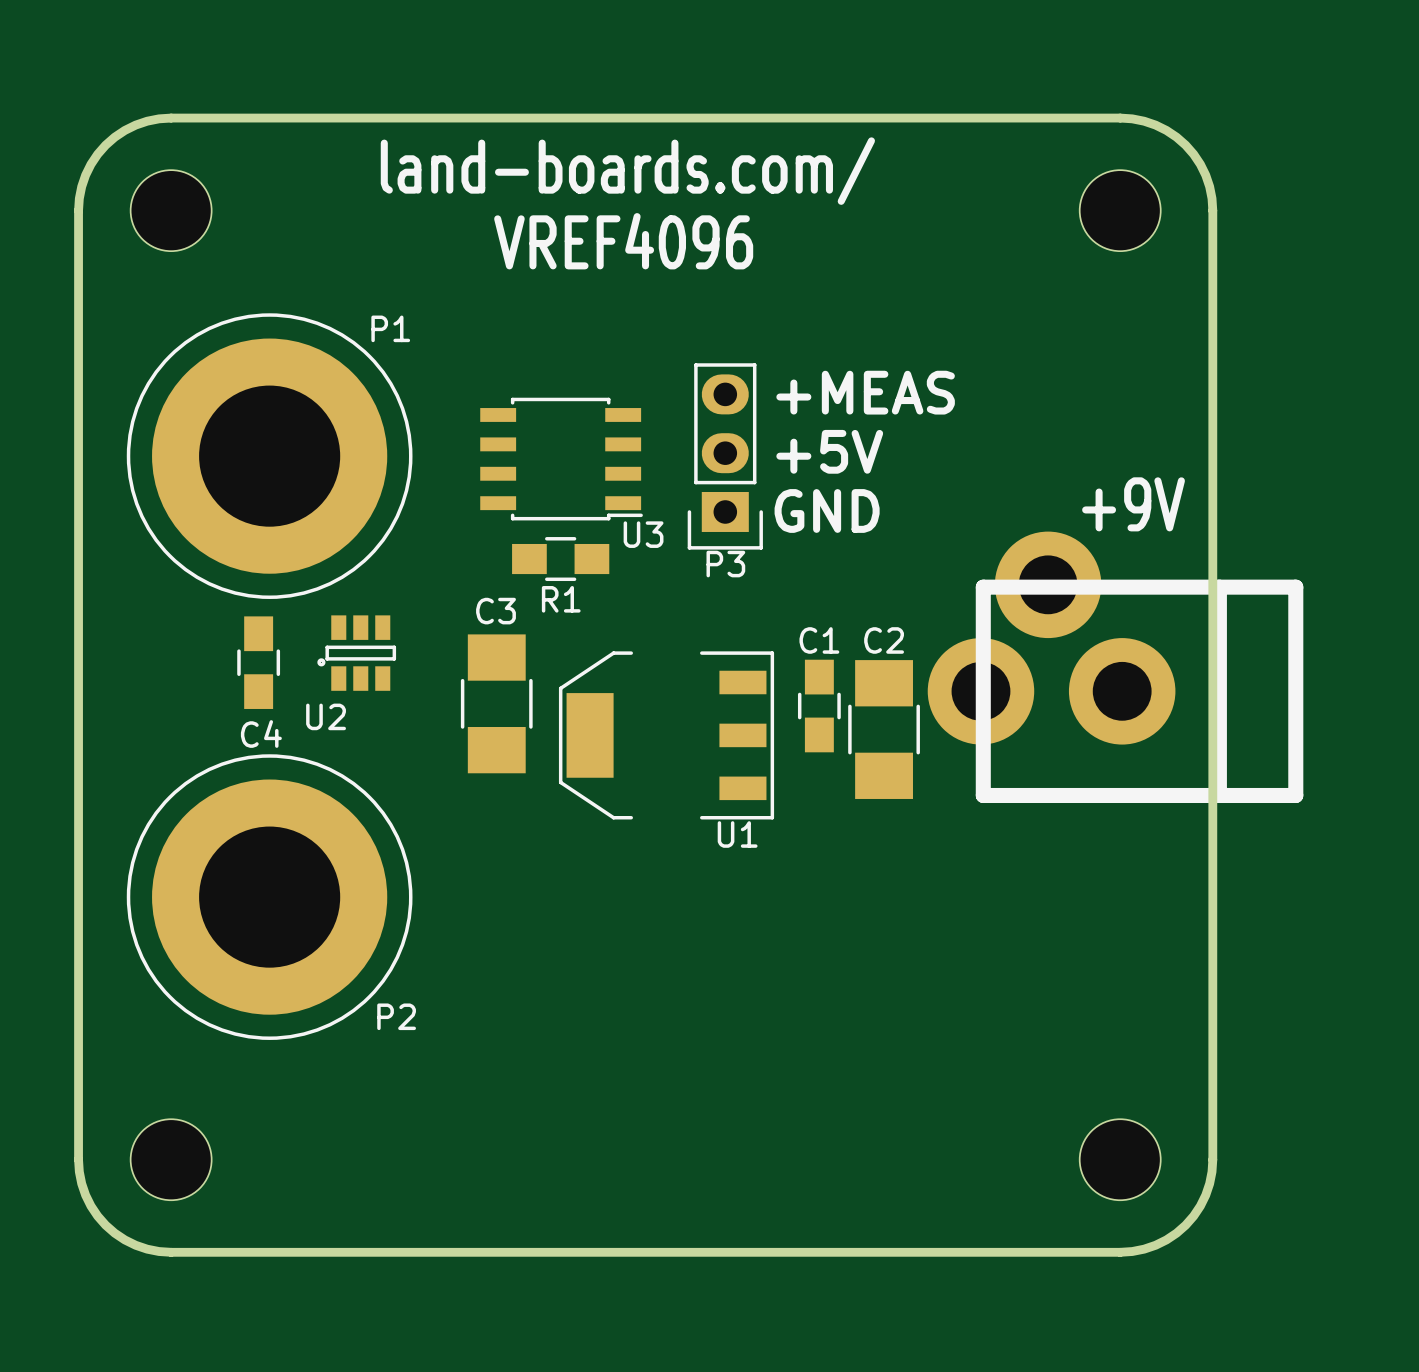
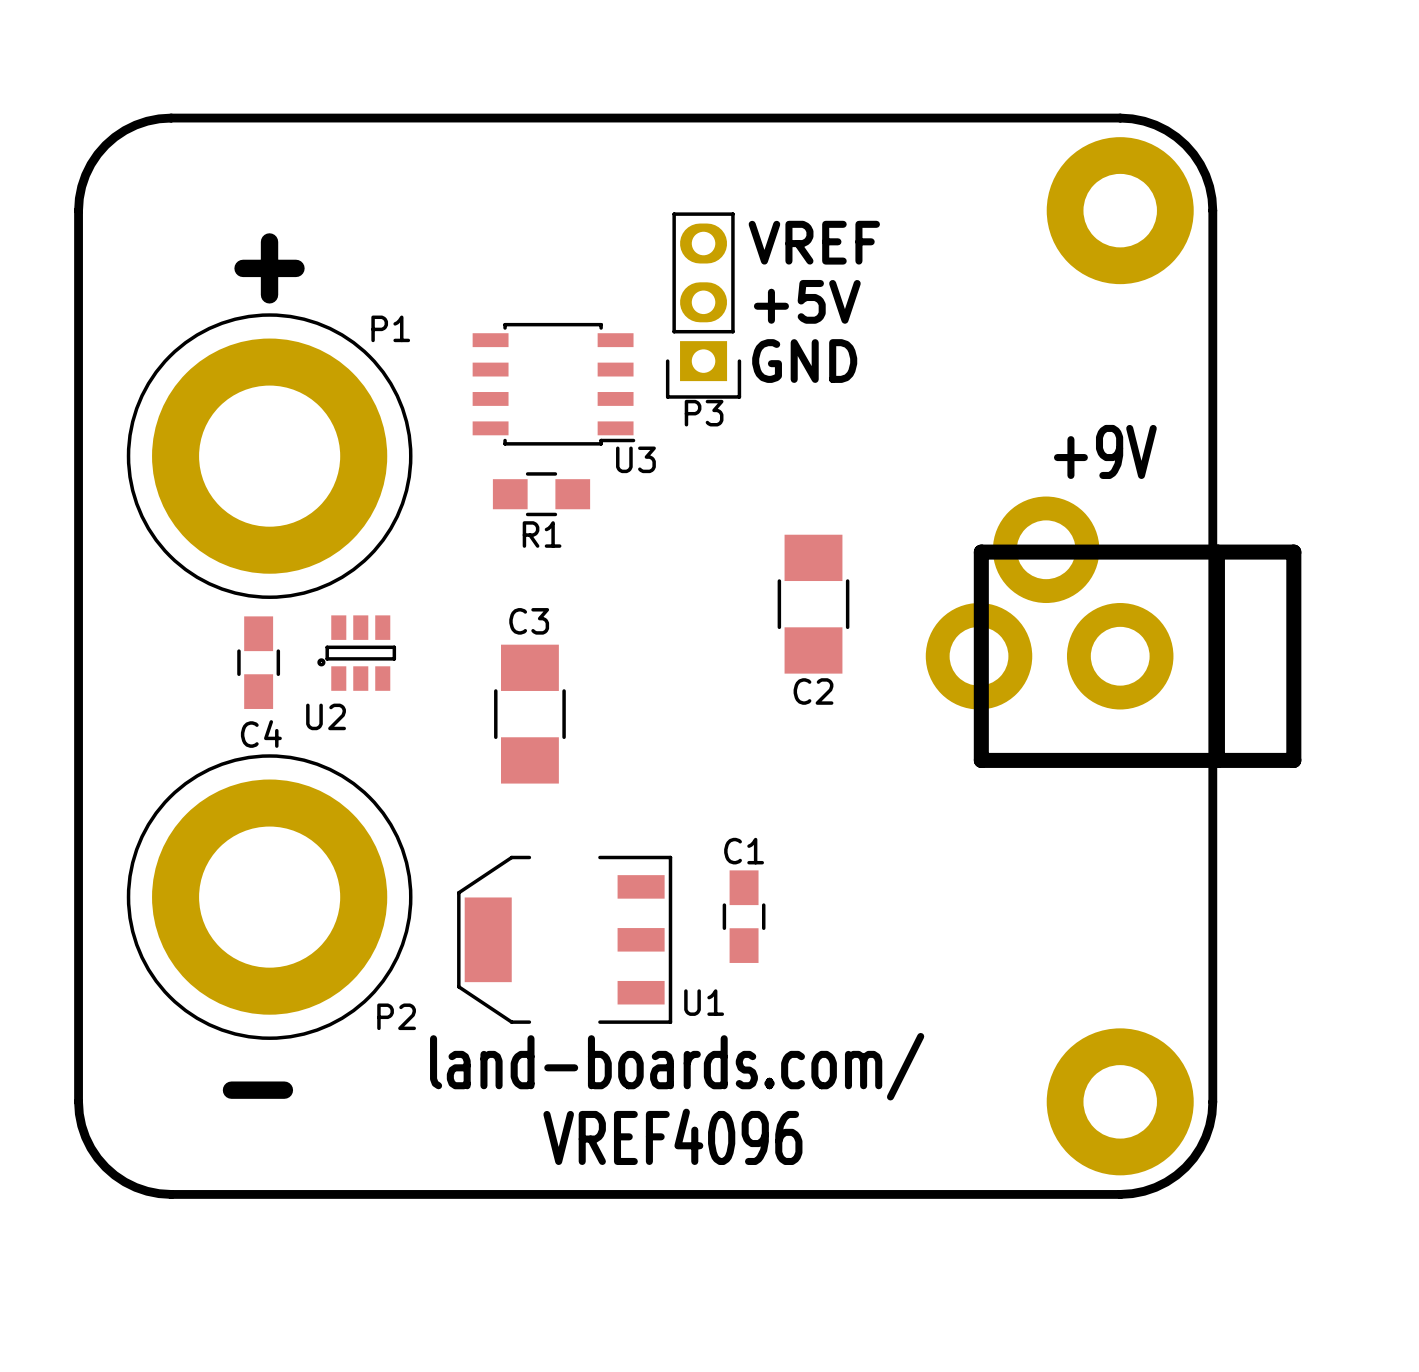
part footprint: [1079, 170, 1161, 252] -> [1046, 137, 1194, 285]
text: land-boards.com/ (627, 171) -> none
part: (171, 210) -> none
text: VREF4096 (623, 241) -> VREF (814, 242)
text: none -> + (269, 268)
text: +MEAS (865, 392) -> none
text position: +5V (829, 451) -> +5V (807, 301)
P3 position: (725, 456) -> (703, 305)
U3 position: (561, 459) -> (553, 384)
text position: +9V (1133, 504) -> +9V (1105, 451)
text position: GND (827, 510) -> GND (804, 361)
R1 position: (560, 559) -> (541, 494)
C2 name position: C2 (884, 640) -> C2 (813, 691)
part position: (1115, 667) -> (1113, 632)
C3 position: (496, 703) -> (529, 714)
C1 position: (819, 706) -> (744, 916)
C2 position: (884, 729) -> (813, 604)
U1 position: (666, 735) -> (564, 939)
U1 name position: U1 (737, 834) -> U1 (704, 1002)
text: none -> land-boards.com/ (677, 1066)
text: none -> - (257, 1090)
board edge: (78, 1101) (79, 1171) (85, 1195) (90, 1206) (105, 1225) (124, 1239) (147, 1249) (171, 1252) (1132, 1251) (1155, 1245) (1166, 1239) (1185, 1225) (1200, 1206) (1205, 1195) (1212, 1171) (1212, 1101) -> (78, 1101) (79, 1113) (85, 1137) (97, 1158) (105, 1167) (124, 1182) (135, 1187) (159, 1193) (171, 1194) (1132, 1193) (1155, 1187) (1166, 1182) (1185, 1167) (1200, 1148) (1205, 1137) (1212, 1113) (1212, 1101)
part: none -> (1120, 1101)
text: none -> VREF4096 (672, 1136)
part: (171, 1159) -> none
part: (1120, 1159) -> none

